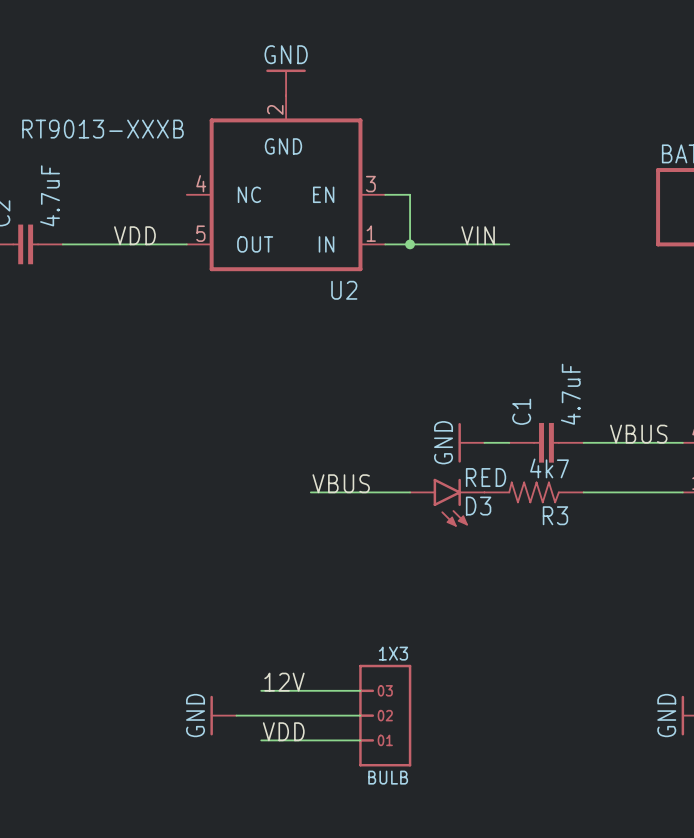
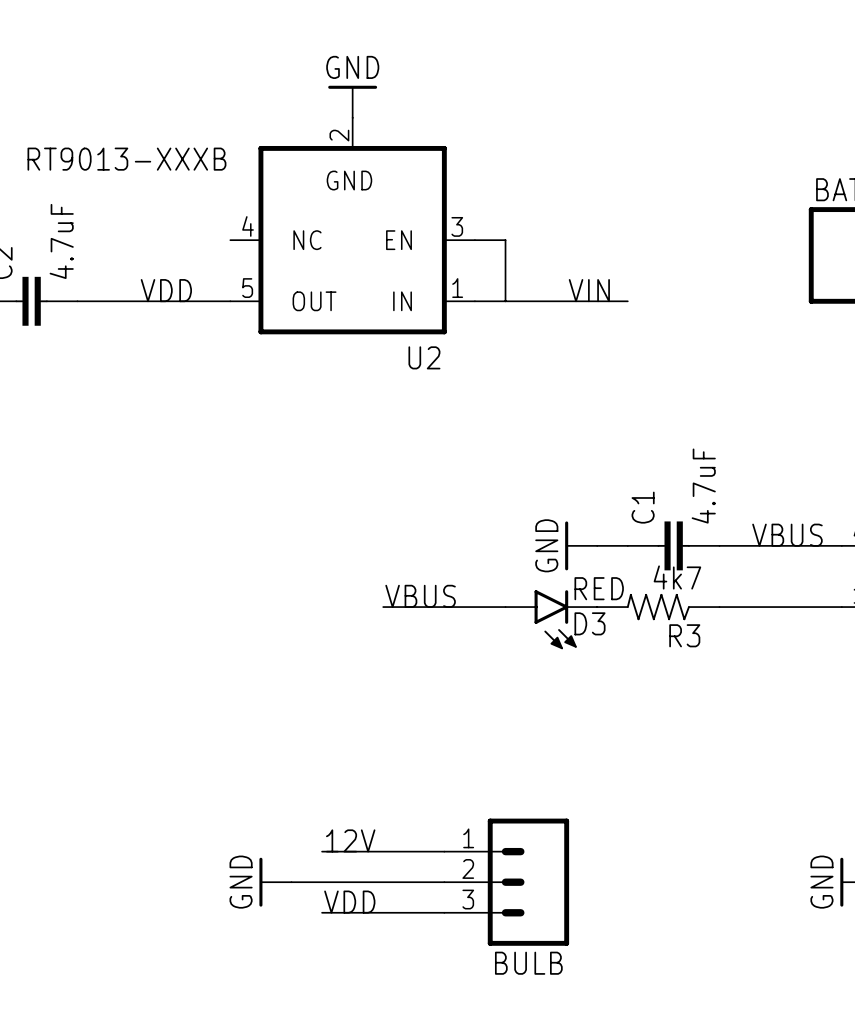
junction: (410, 244) -> none
BULB: 1X3 (385, 715) -> none
BULB: none -> (506, 882)

